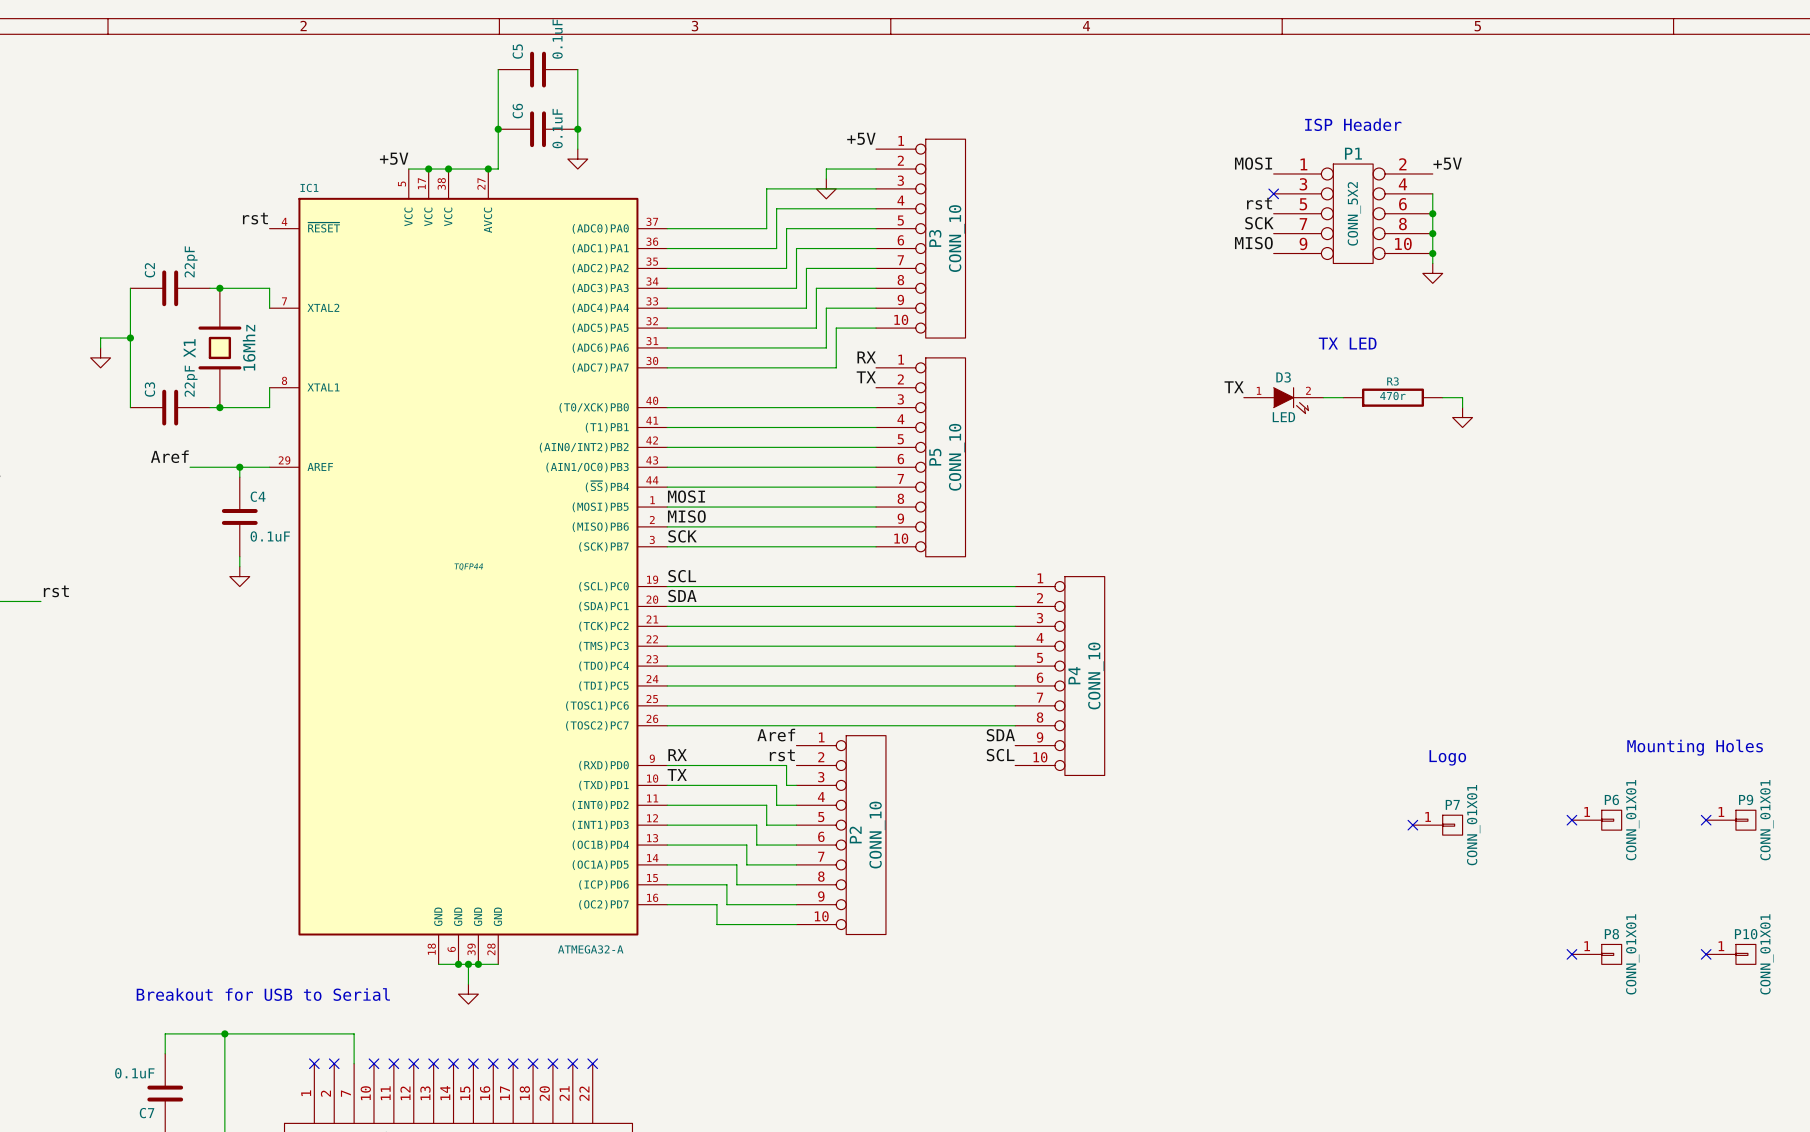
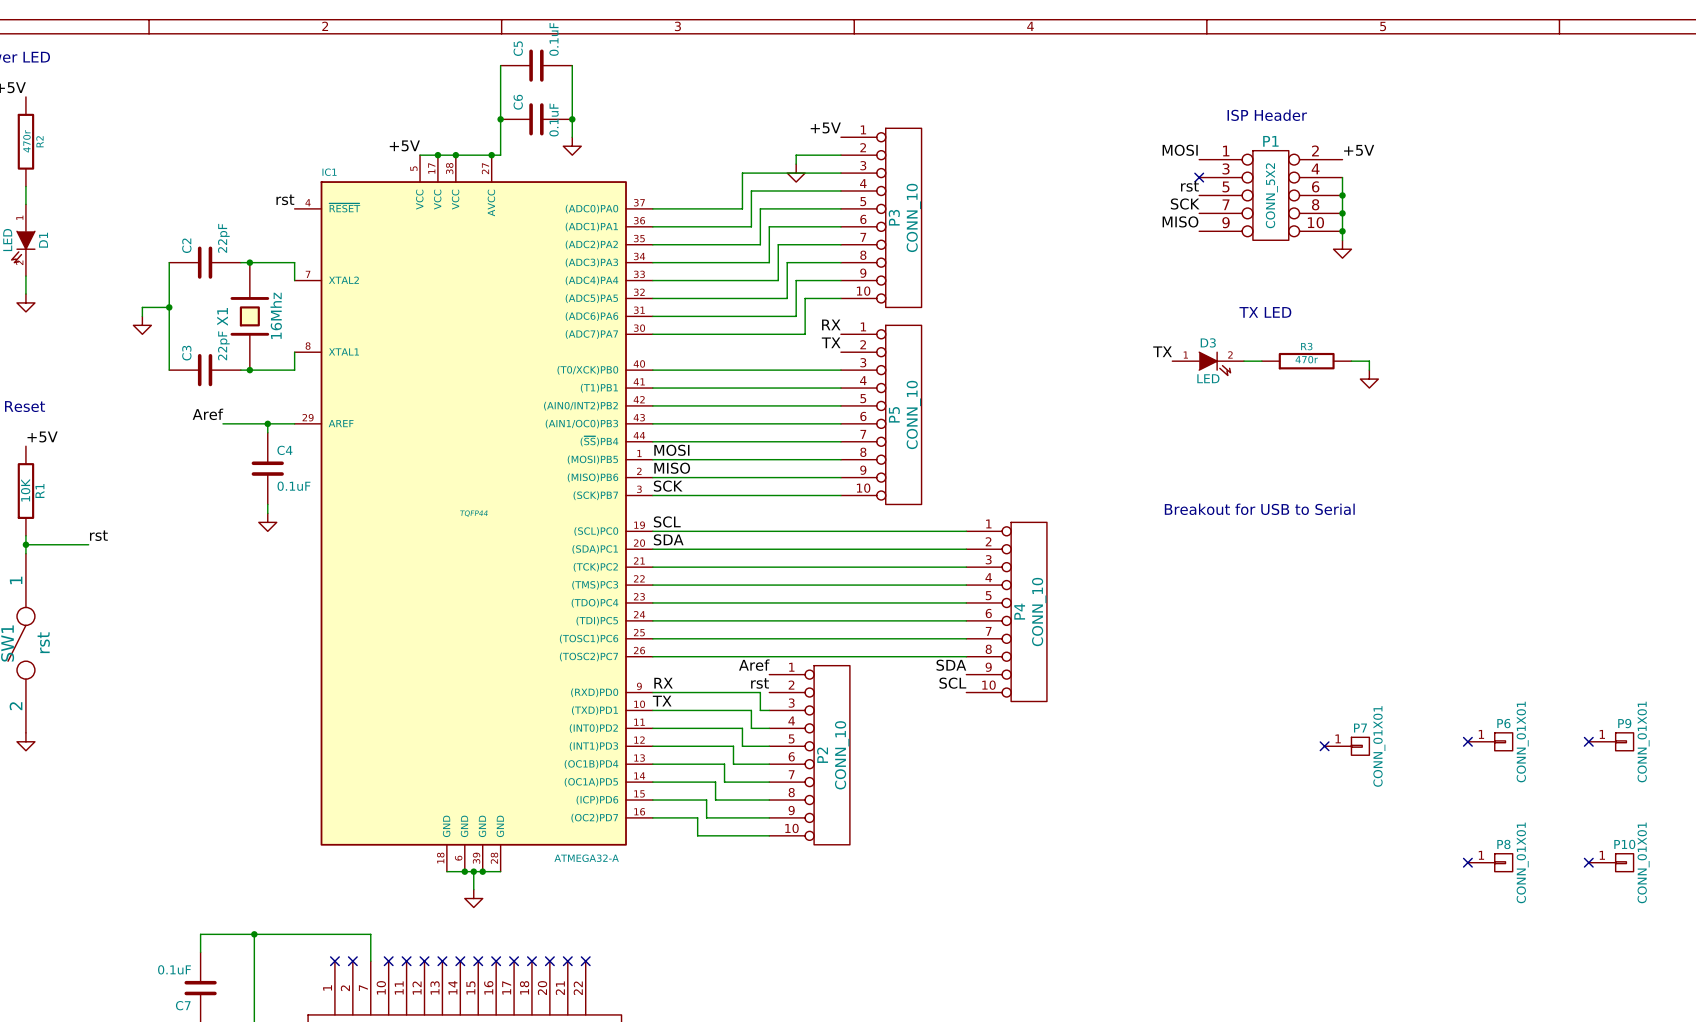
text: none -> Breakout for USB to Serial (1259, 509)
text: Mounting Holes (1695, 747) -> none
text: Logo (1447, 757) -> none
text: Breakout for USB to Serial (263, 994) -> none

